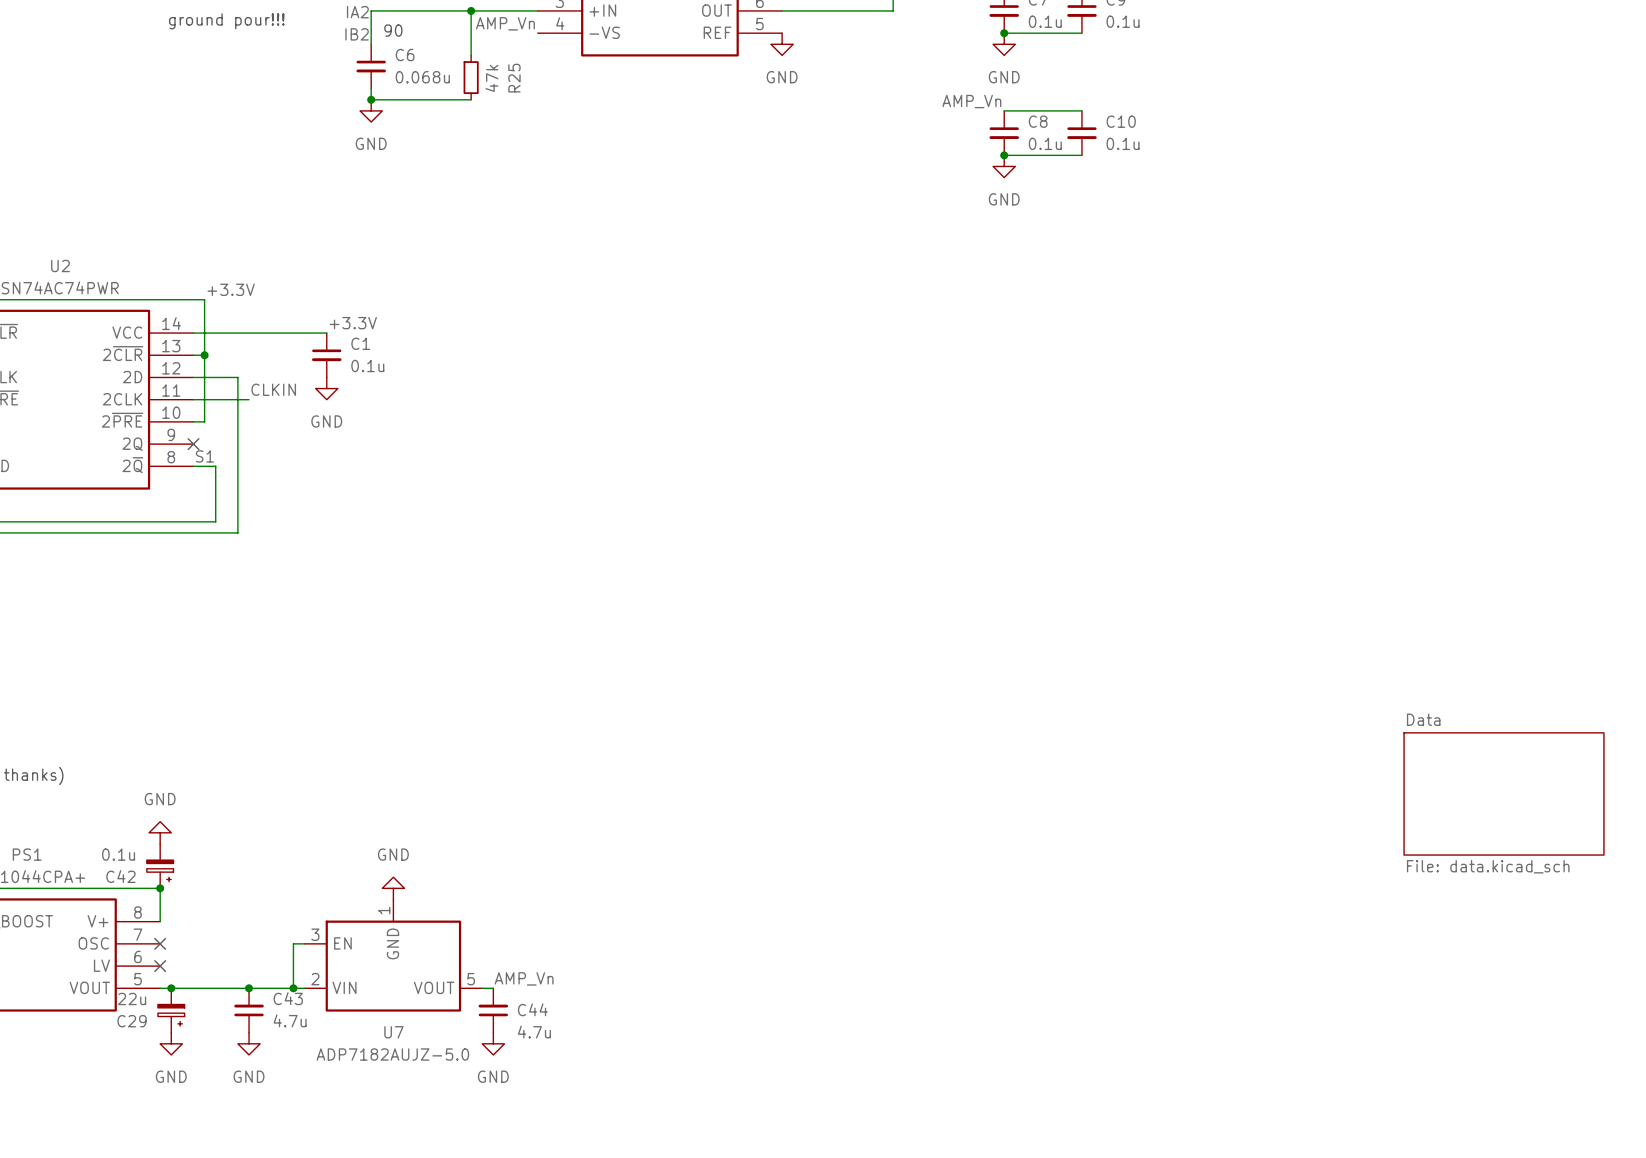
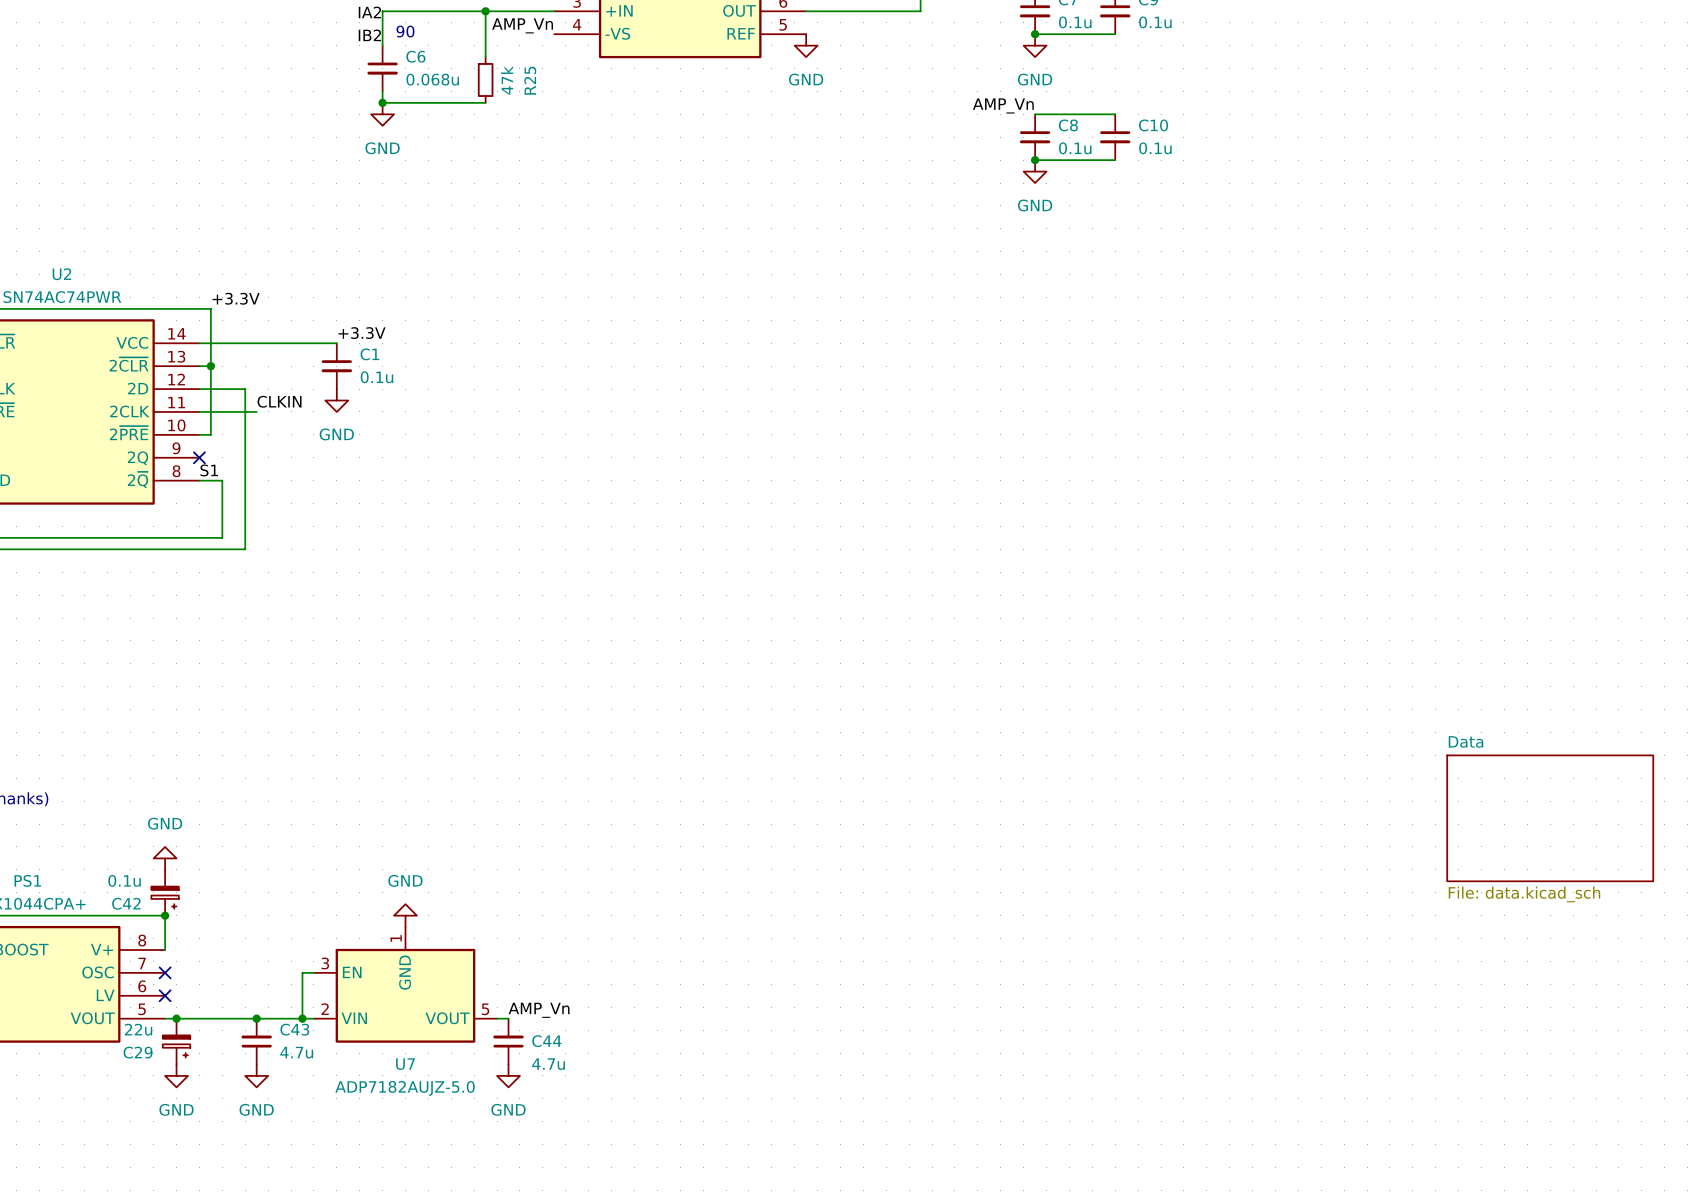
text: ground pour!!! (226, 21) -> none

